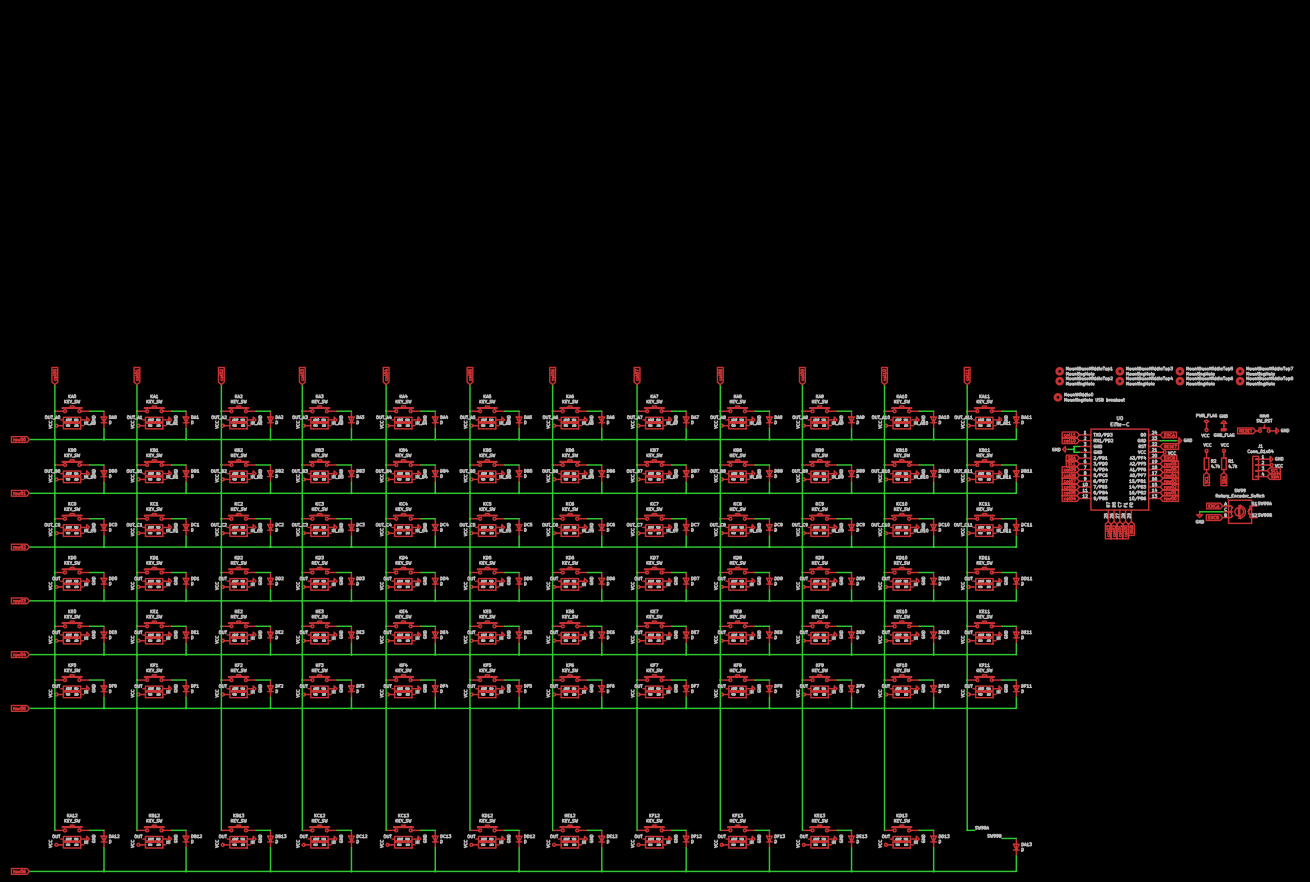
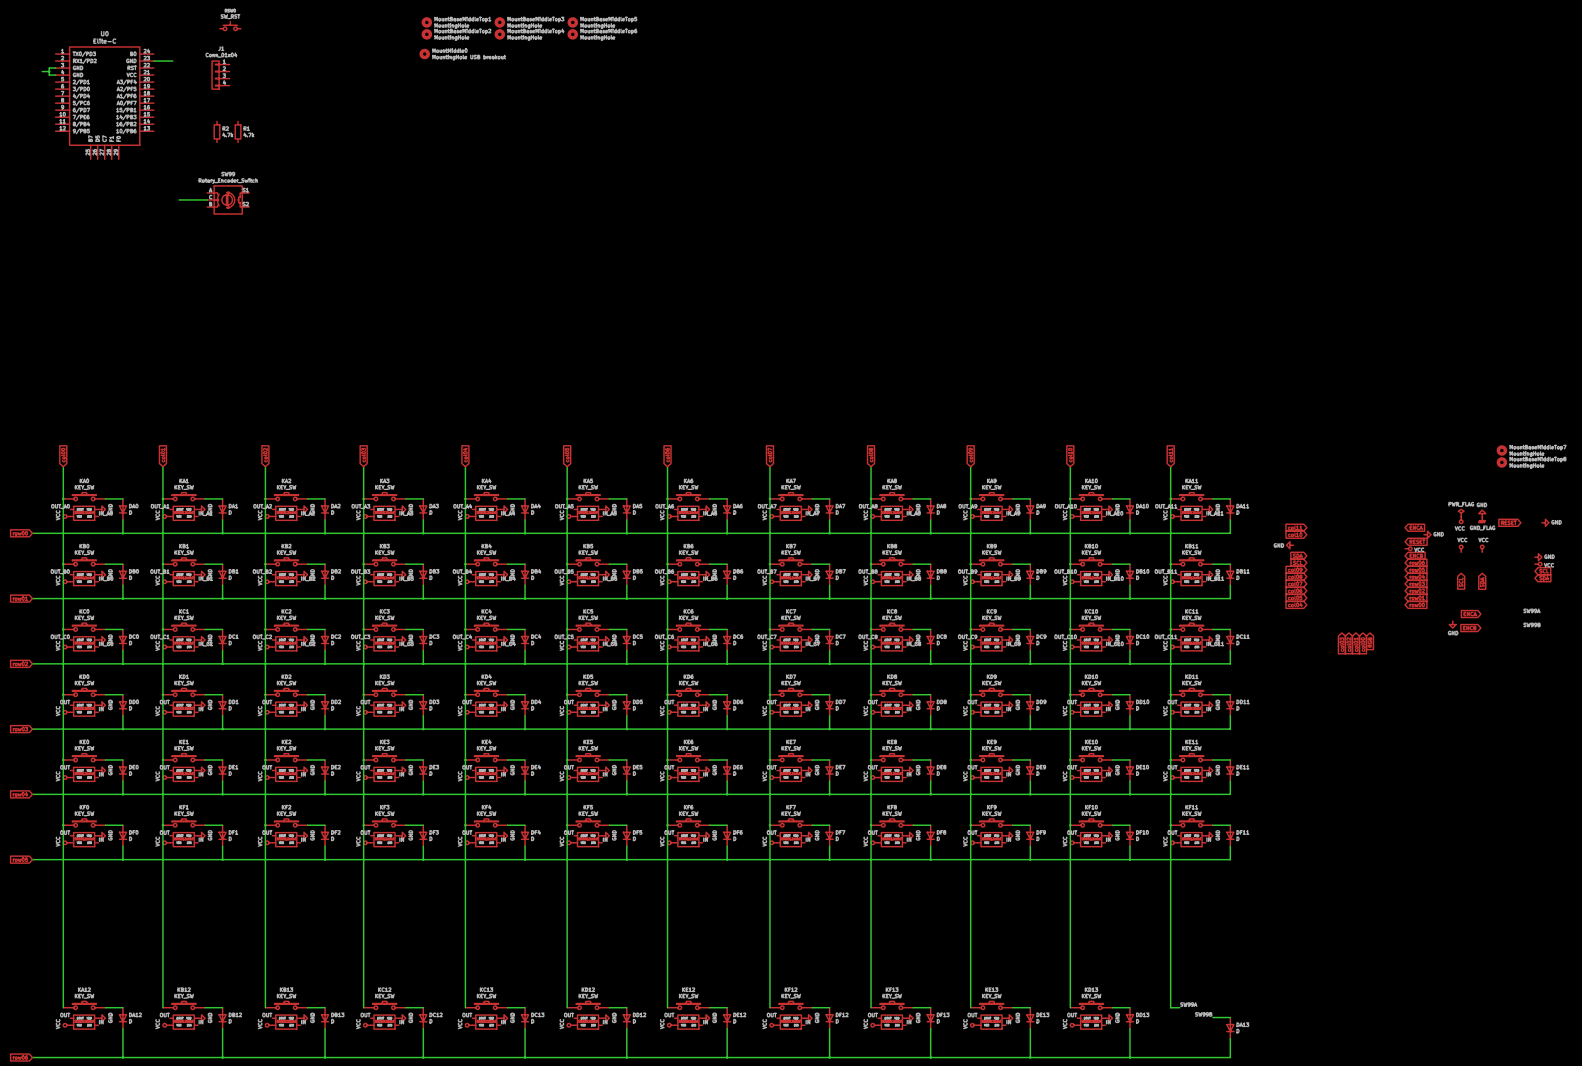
wire: none -> (153, 61) (172, 61)
wire: none -> (55, 68) (49, 68) (49, 75) (55, 75)
wire: none -> (42, 71) (49, 71)
wire: none -> (179, 199) (207, 199)
part position: (1059, 371) -> (426, 22)
part position: (1119, 371) -> (499, 22)
part position: (1179, 371) -> (572, 22)
part position: (1059, 381) -> (426, 34)
part position: (1119, 381) -> (499, 34)
part position: (1179, 381) -> (572, 34)
part position: (1057, 397) -> (424, 54)
part position: (1264, 428) -> (230, 26)
wire: (1160, 440) (1175, 440) -> none
wire: (1079, 446) (1074, 446) (1074, 452) (1079, 452) -> none
wire: (1068, 449) (1074, 449) -> none
part position: (1206, 463) -> (216, 131)
part position: (1223, 463) -> (238, 131)
part position: (1259, 467) -> (220, 75)
part position: (1119, 475) -> (104, 103)
wire: (1199, 511) (1222, 511) -> none
part position: (1240, 511) -> (228, 199)

